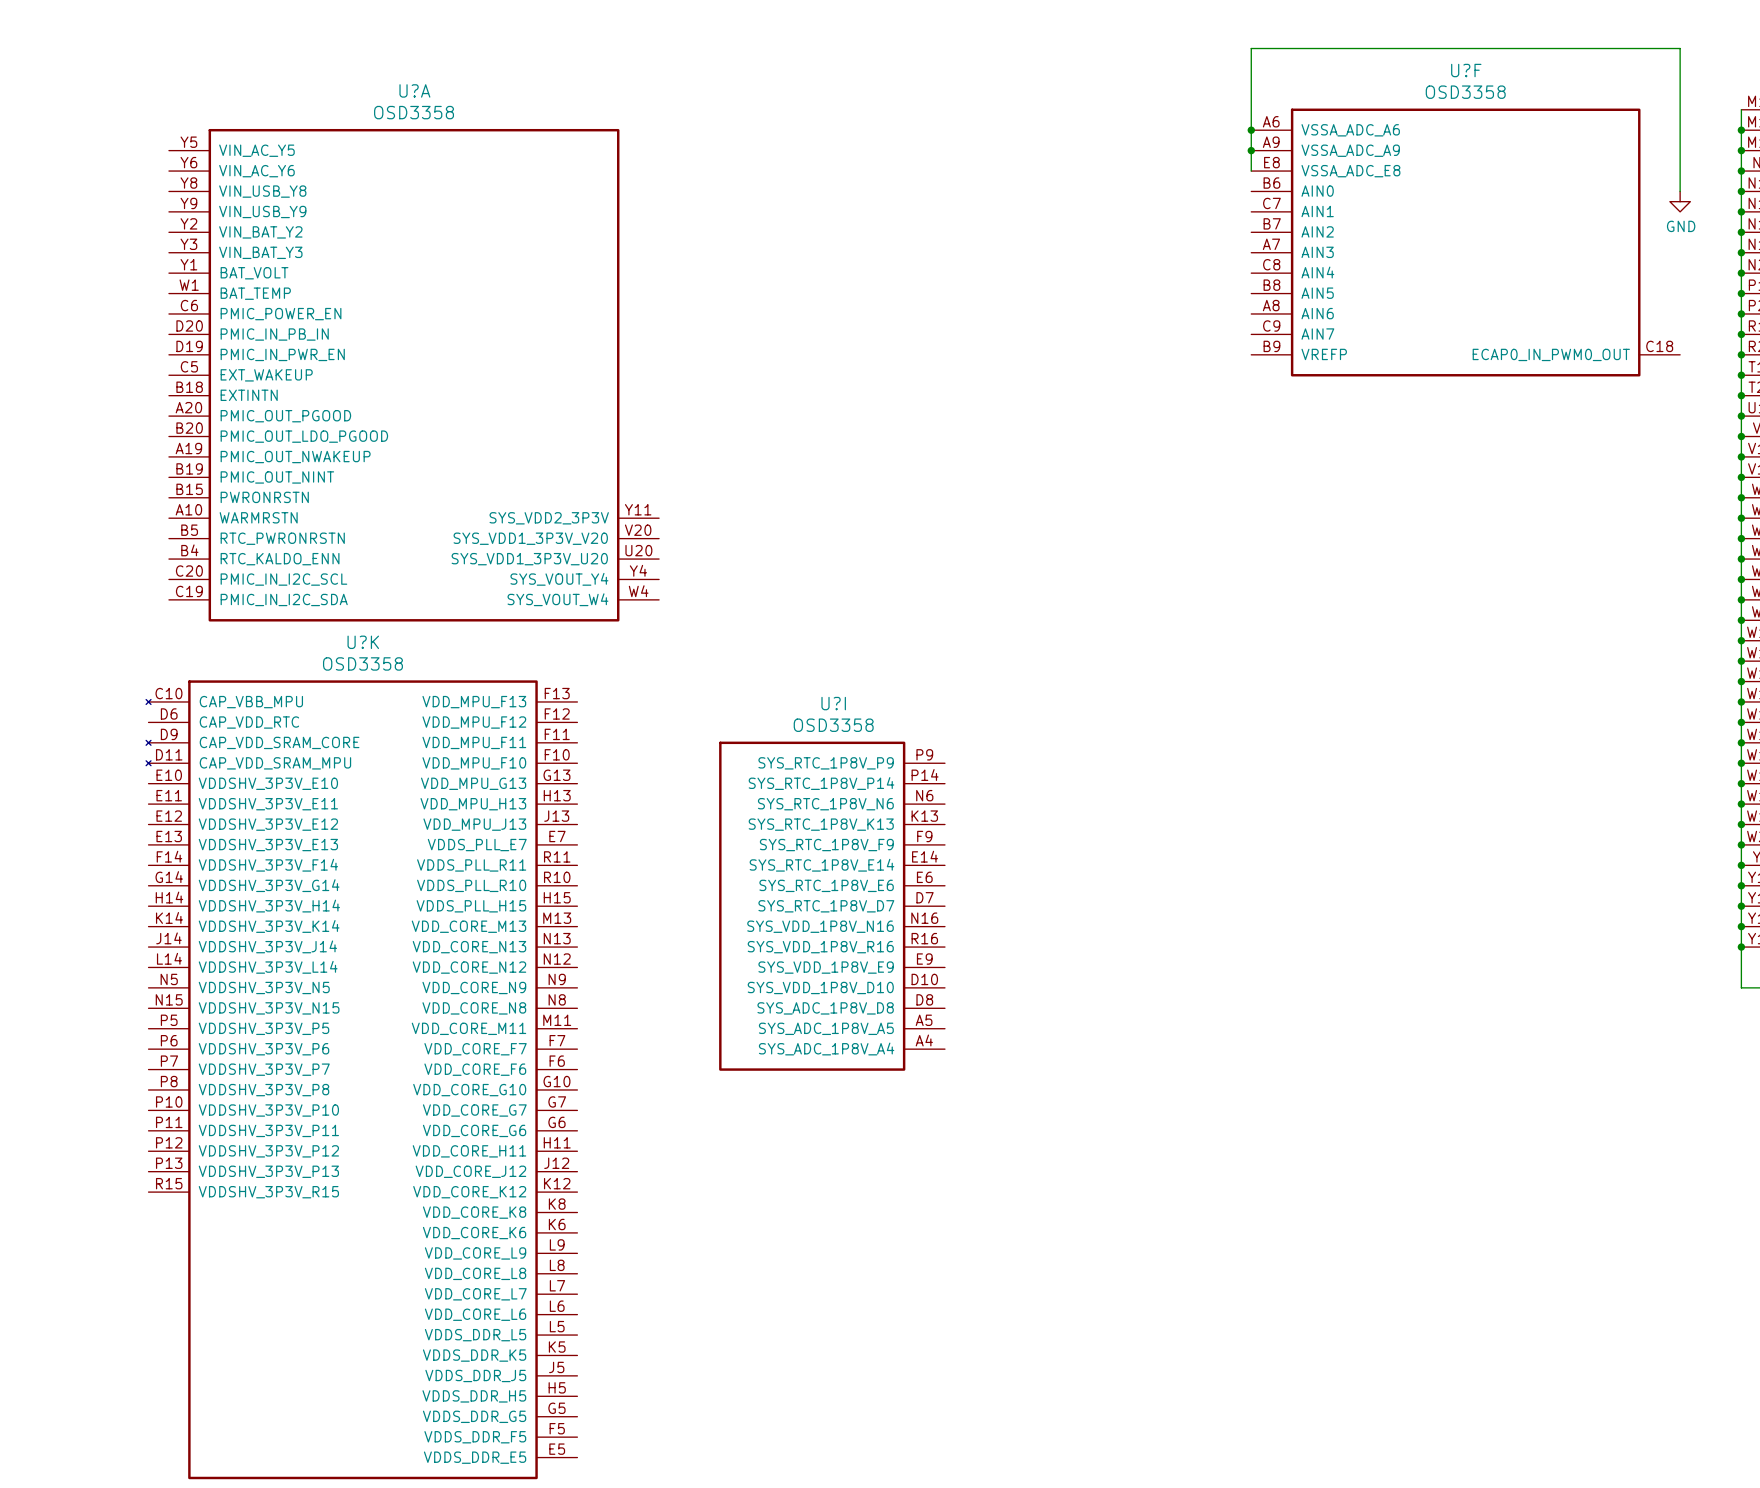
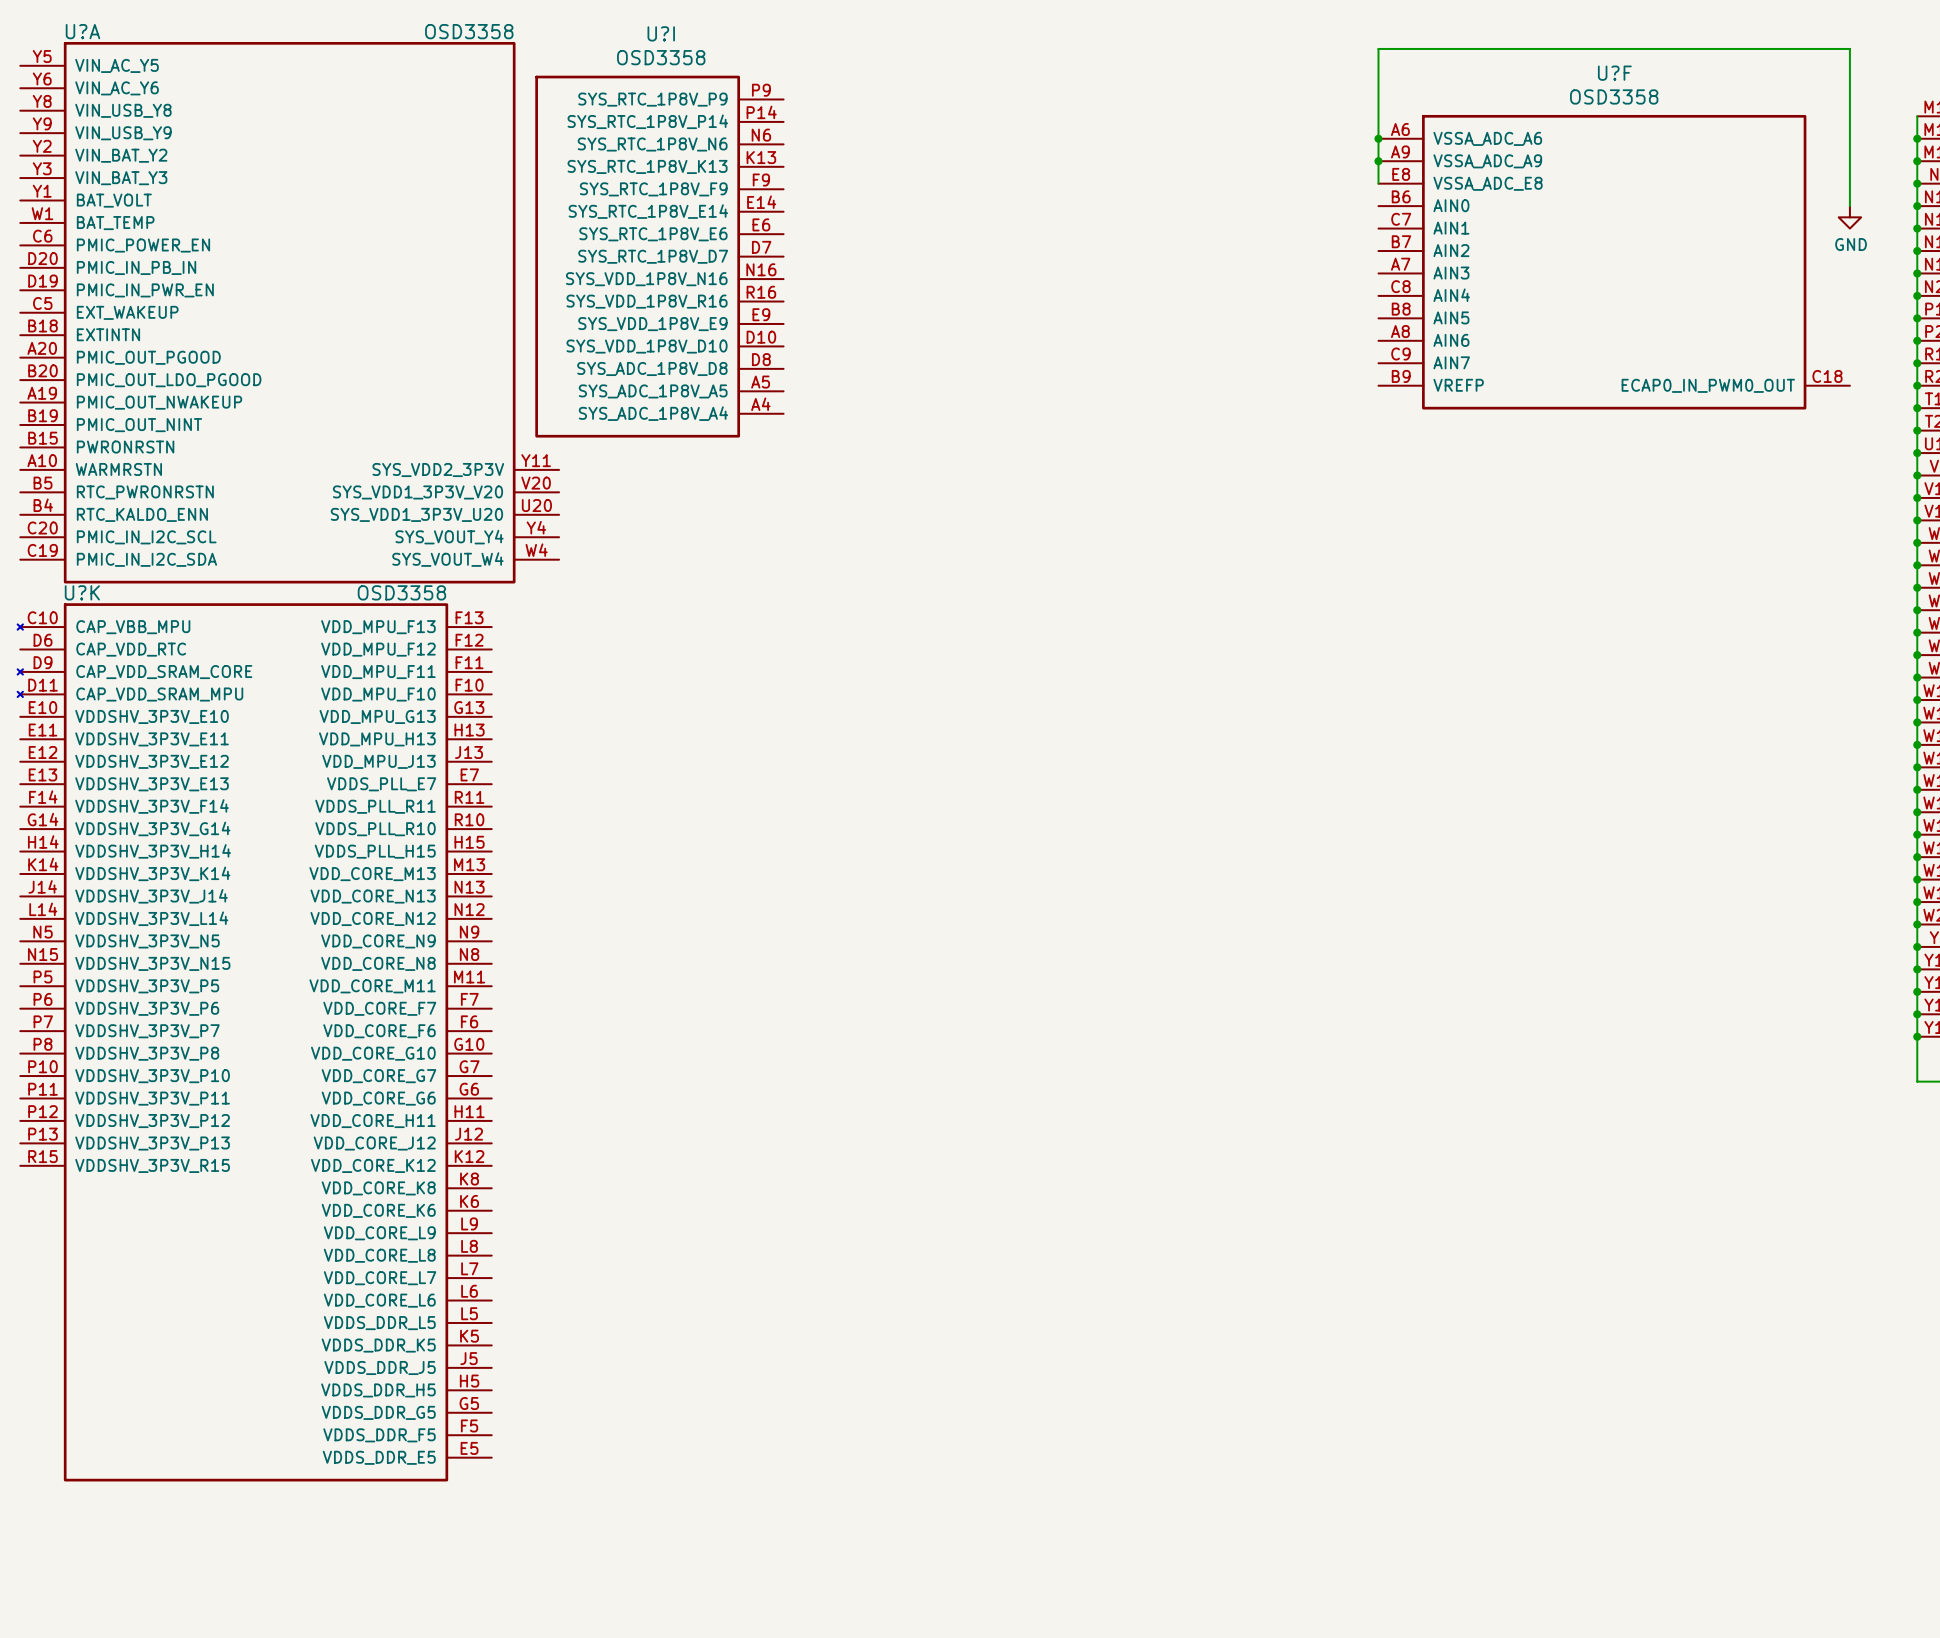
U?A name position: U?A (414, 90) -> U?A (82, 31)
U?A value position: OSD3358 (414, 112) -> OSD3358 (469, 31)
U?I: none -> OSD3358 (659, 256)
U?A position: (414, 375) -> (289, 312)
U?K name position: U?K (363, 642) -> U?K (82, 592)
U?K value position: OSD3358 (362, 663) -> OSD3358 (401, 592)
U?I: OSD3358 (832, 906) -> none
U?K position: (361, 1079) -> (254, 1042)

